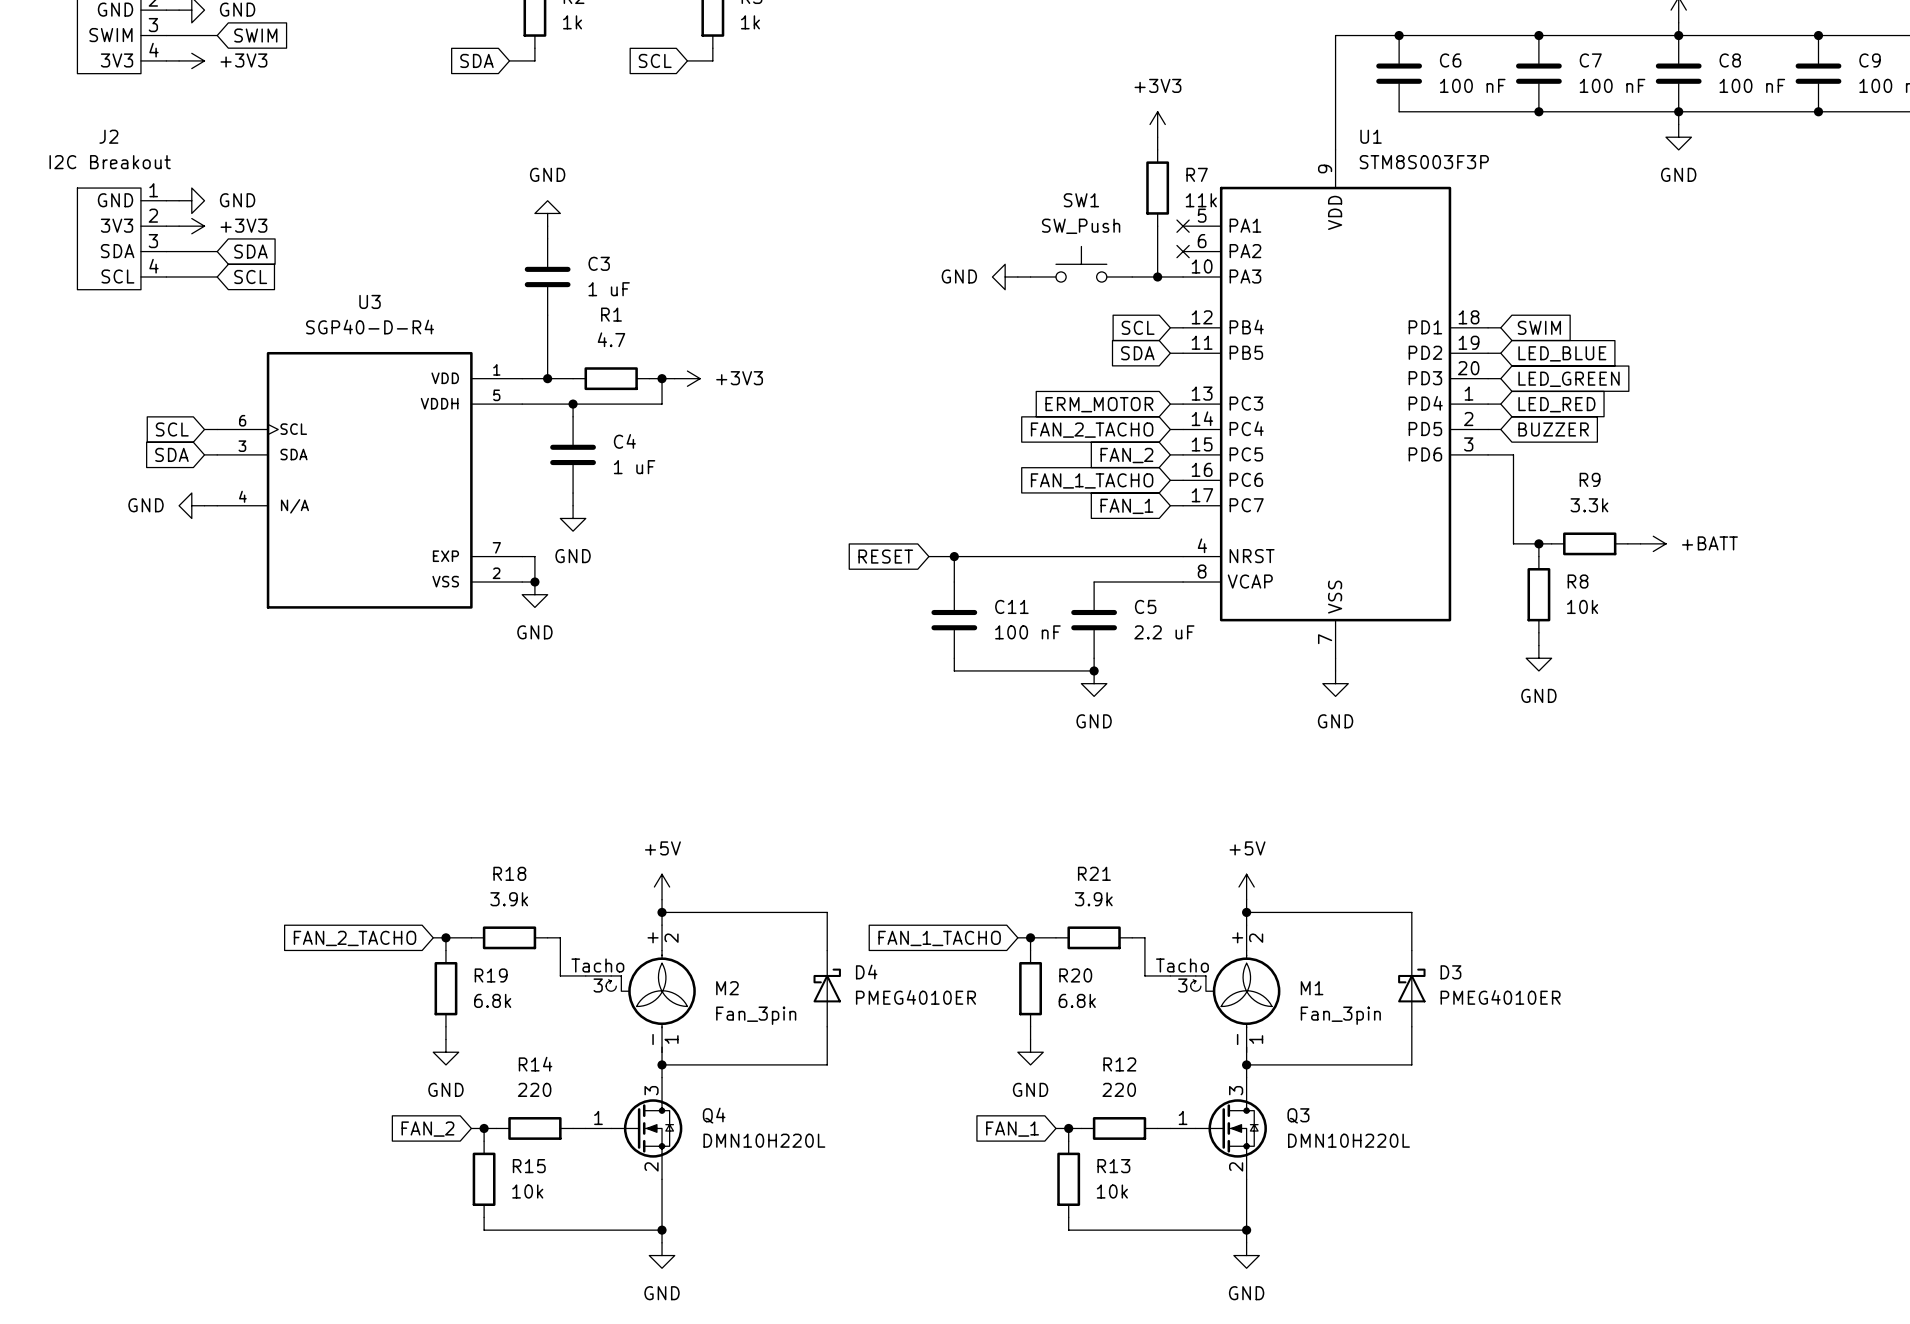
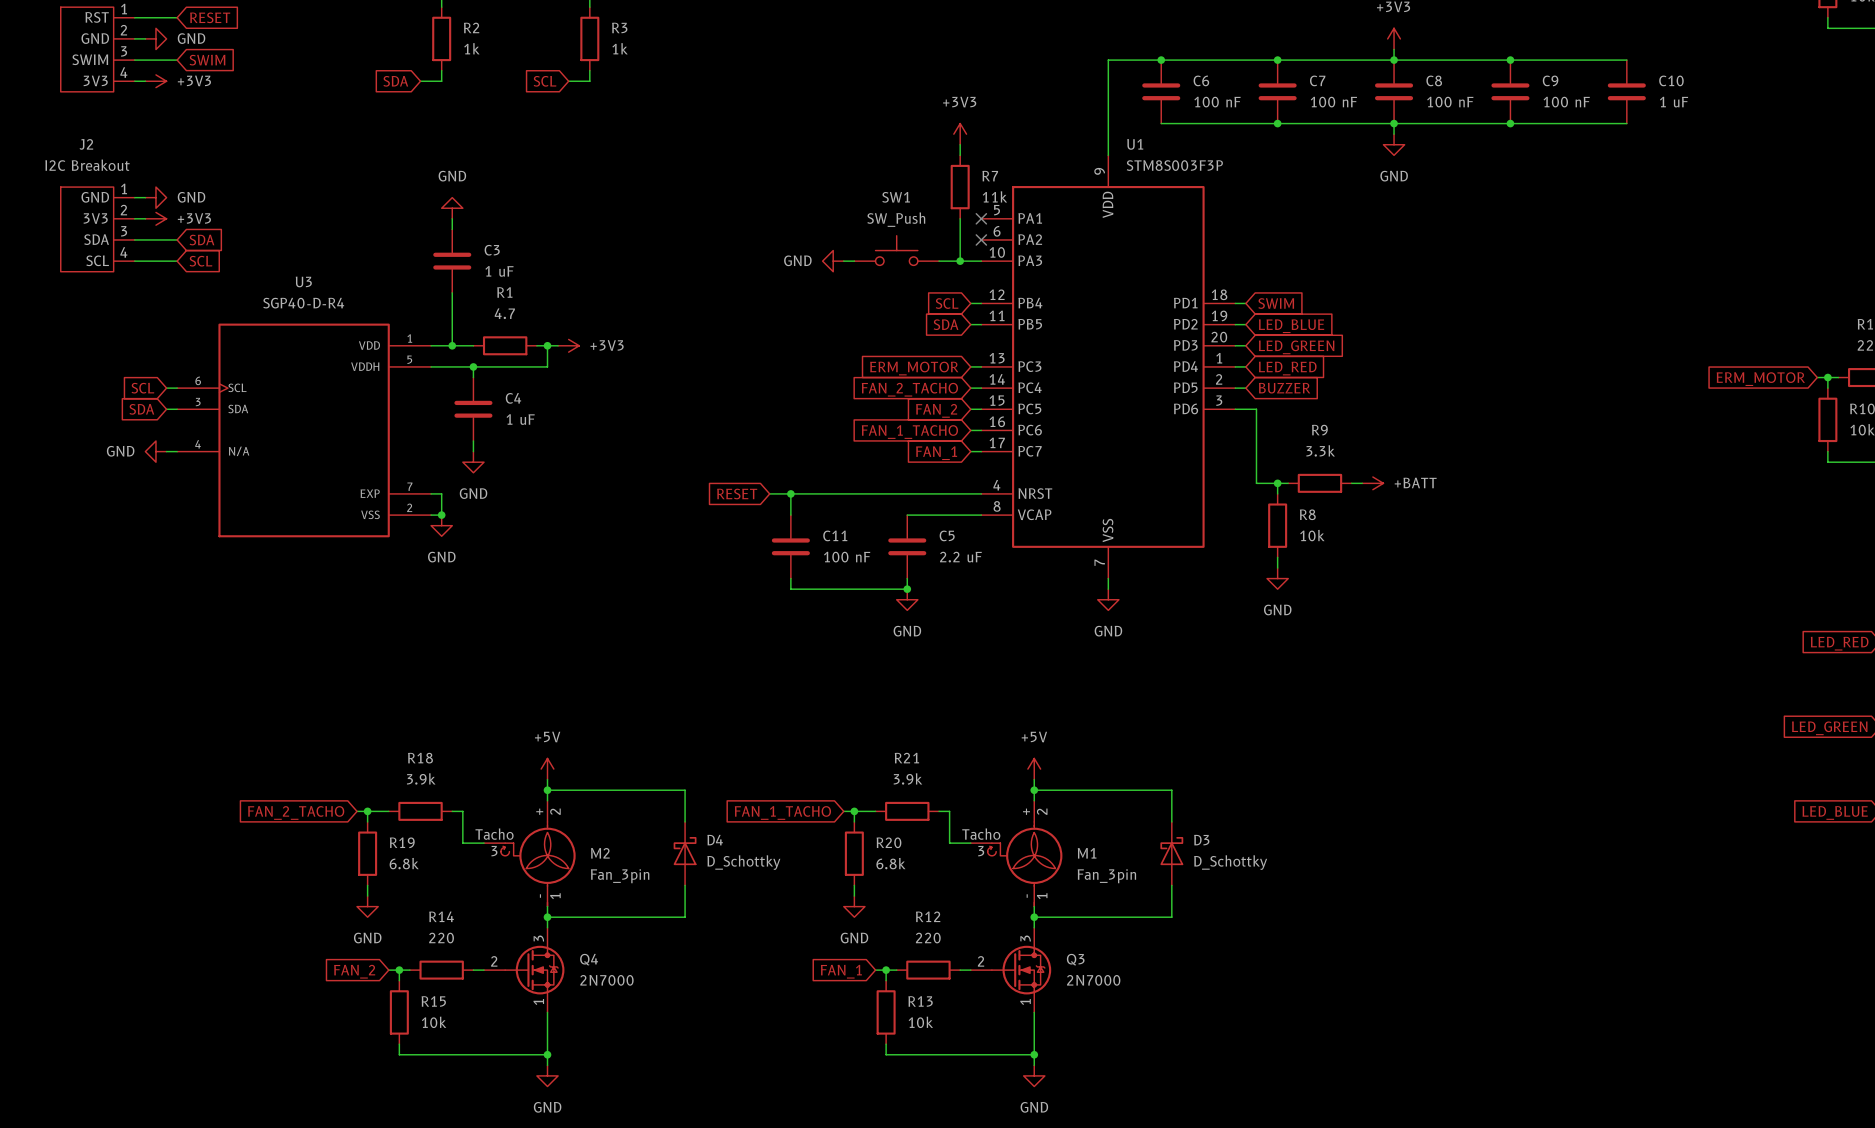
D4 value: PMEG4010ER (915, 997) -> D_Schottky (743, 862)
D3 value: PMEG4010ER (1500, 997) -> D_Schottky (1230, 862)
Q4 symbol: [585, 1077, 683, 1180] -> [484, 927, 565, 1013]
Q3 symbol: [1170, 1077, 1267, 1180] -> [970, 927, 1052, 1013]
Q4 value: DMN10H220L (764, 1140) -> 2N7000 (606, 980)
Q3 value: DMN10H220L (1348, 1140) -> 2N7000 (1093, 980)

